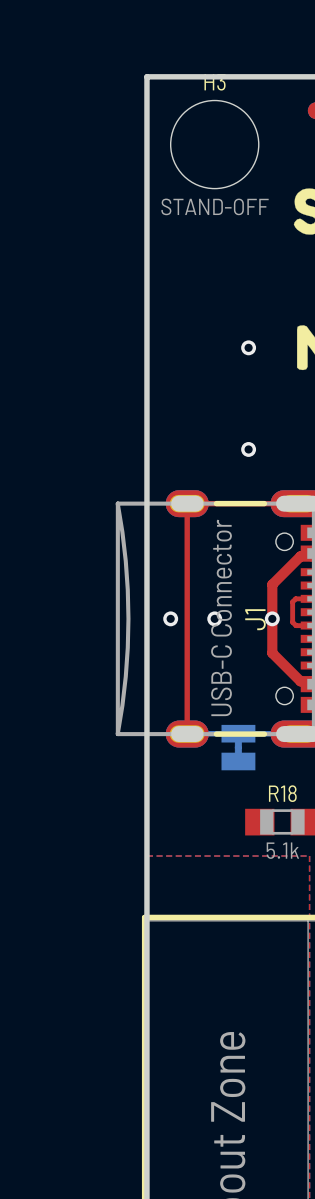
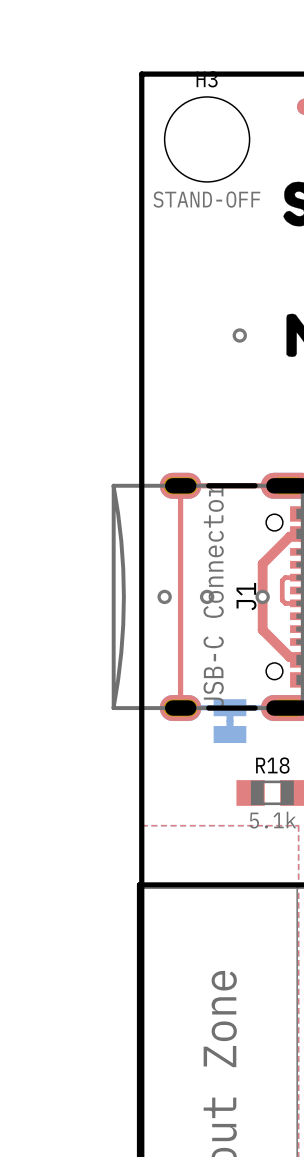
via: (248, 449) -> none

